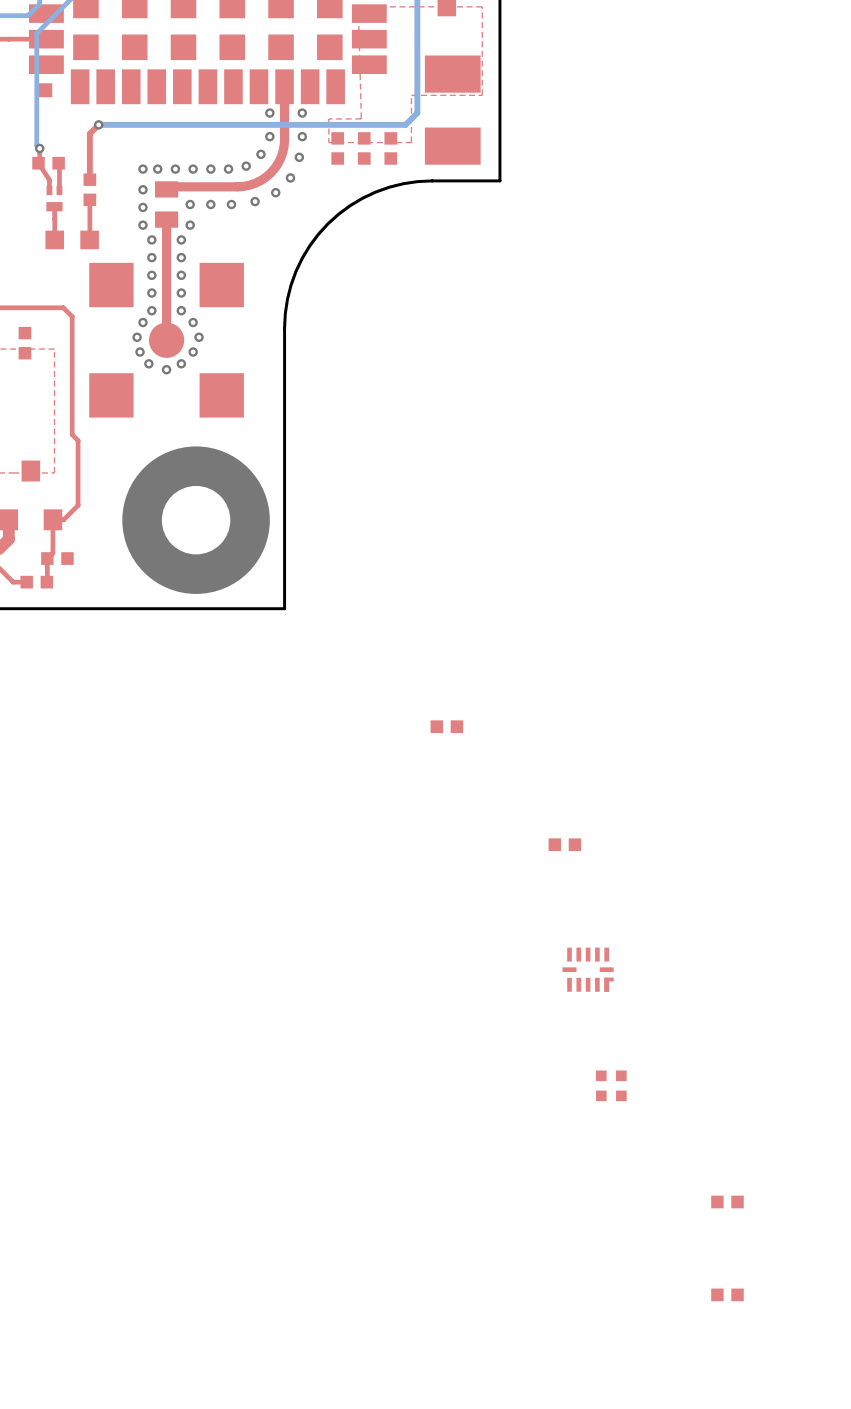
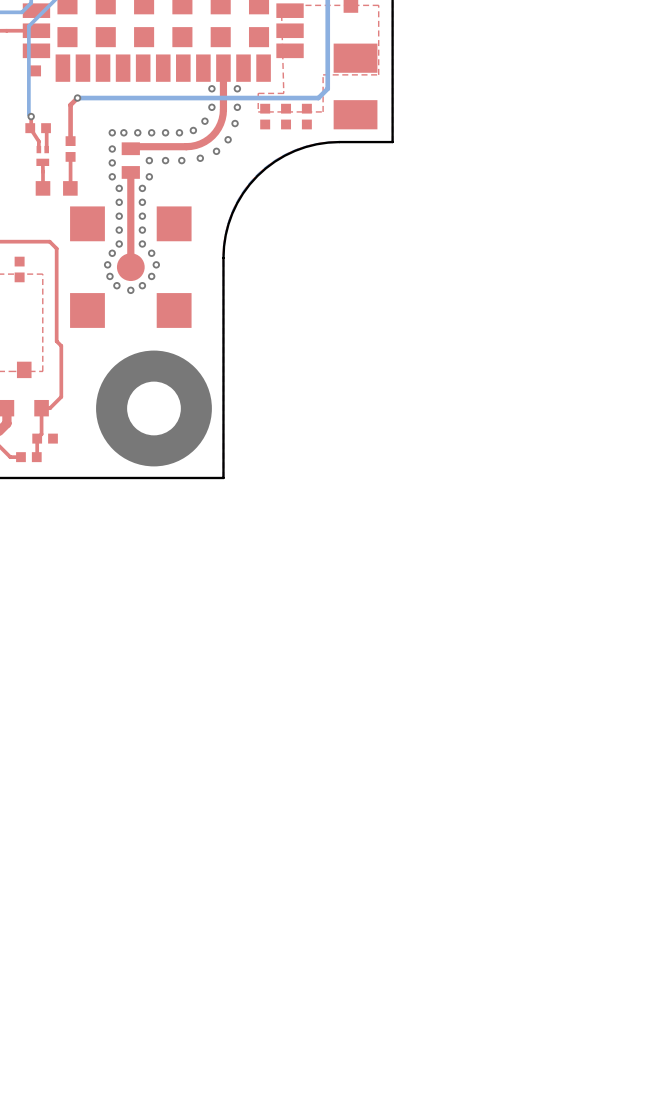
part: (446, 726) -> none
part: (564, 844) -> none
part: (588, 969) -> none
part: (611, 1085) -> none
part: (727, 1201) -> none
part: (727, 1294) -> none

